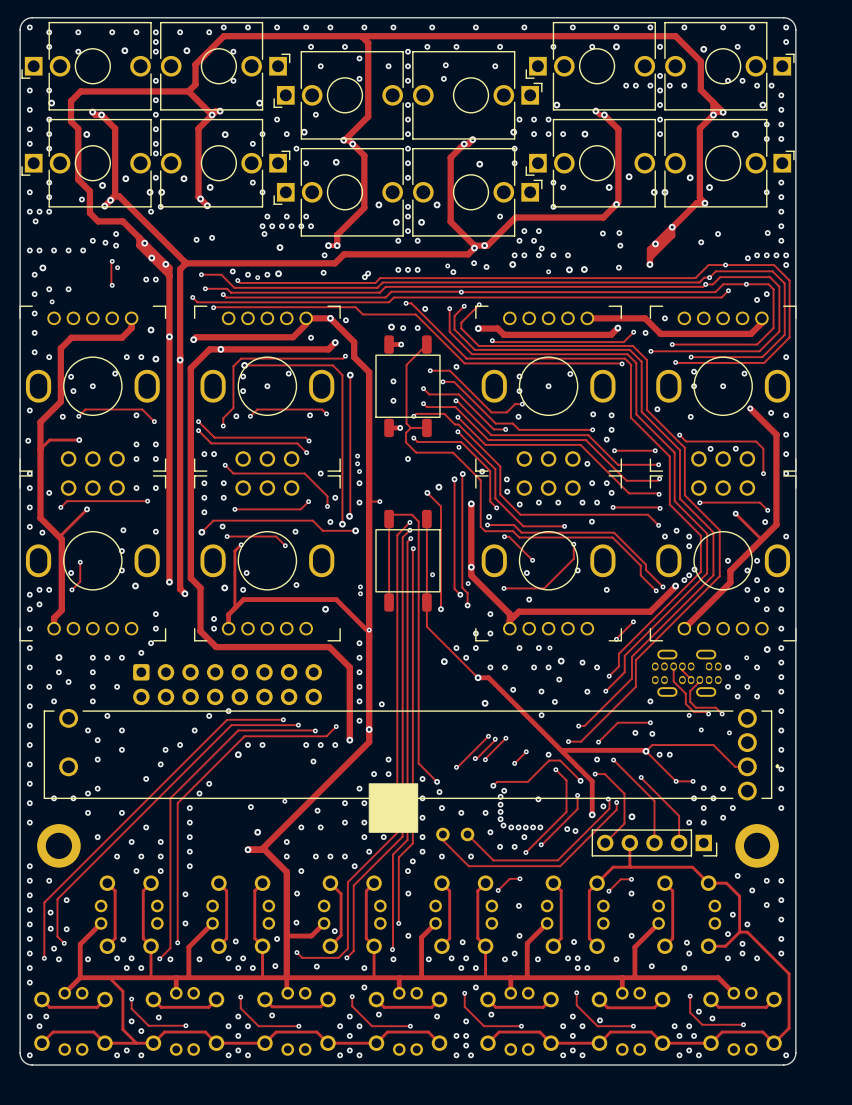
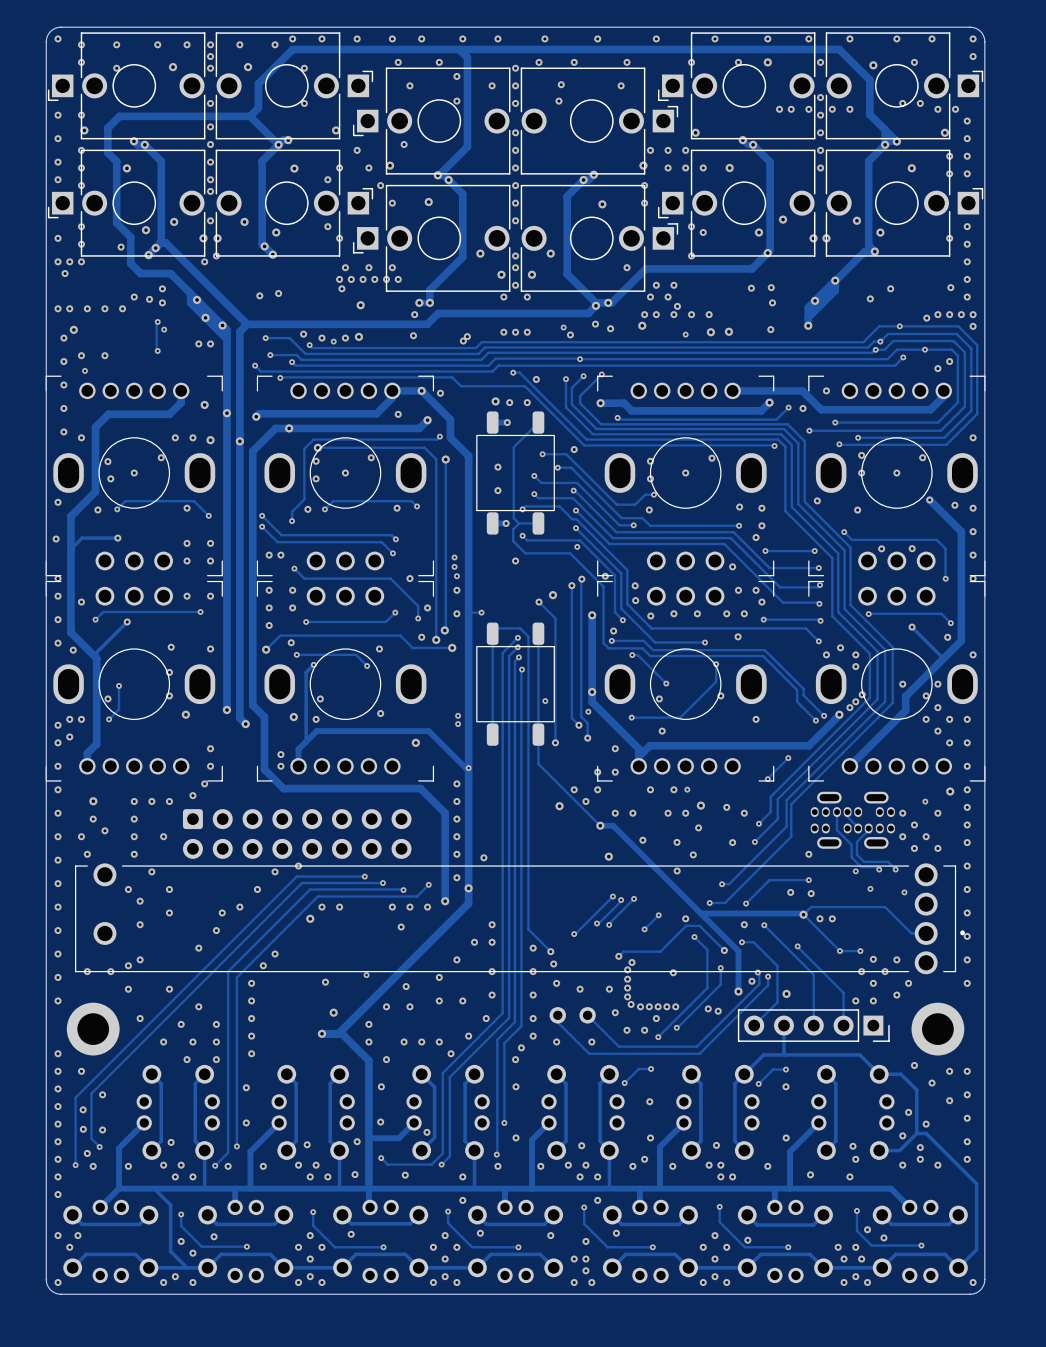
drawing: [368, 783, 419, 833] -> none
via: none -> (492, 971)
via: (364, 803) -> none
via: none -> (492, 995)
via: (364, 837) -> none

